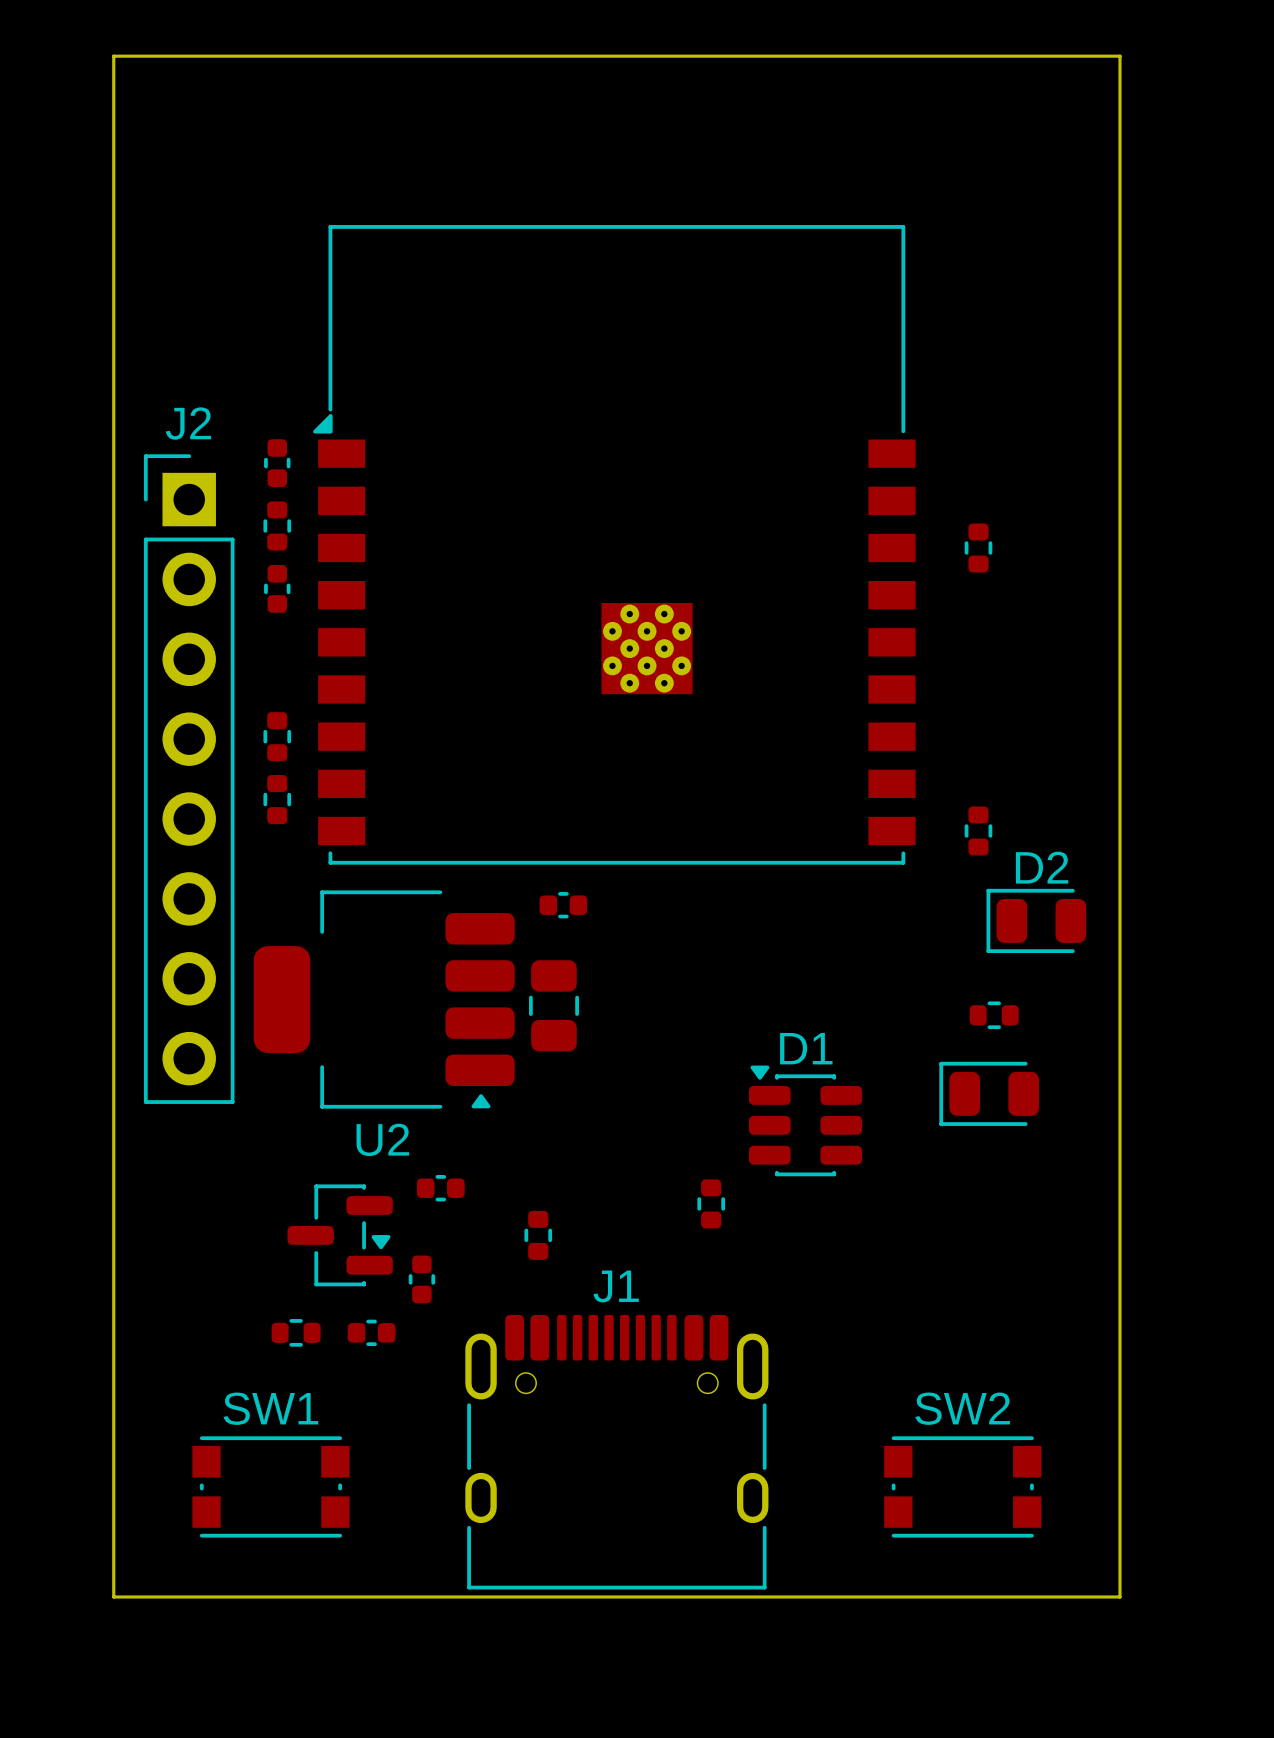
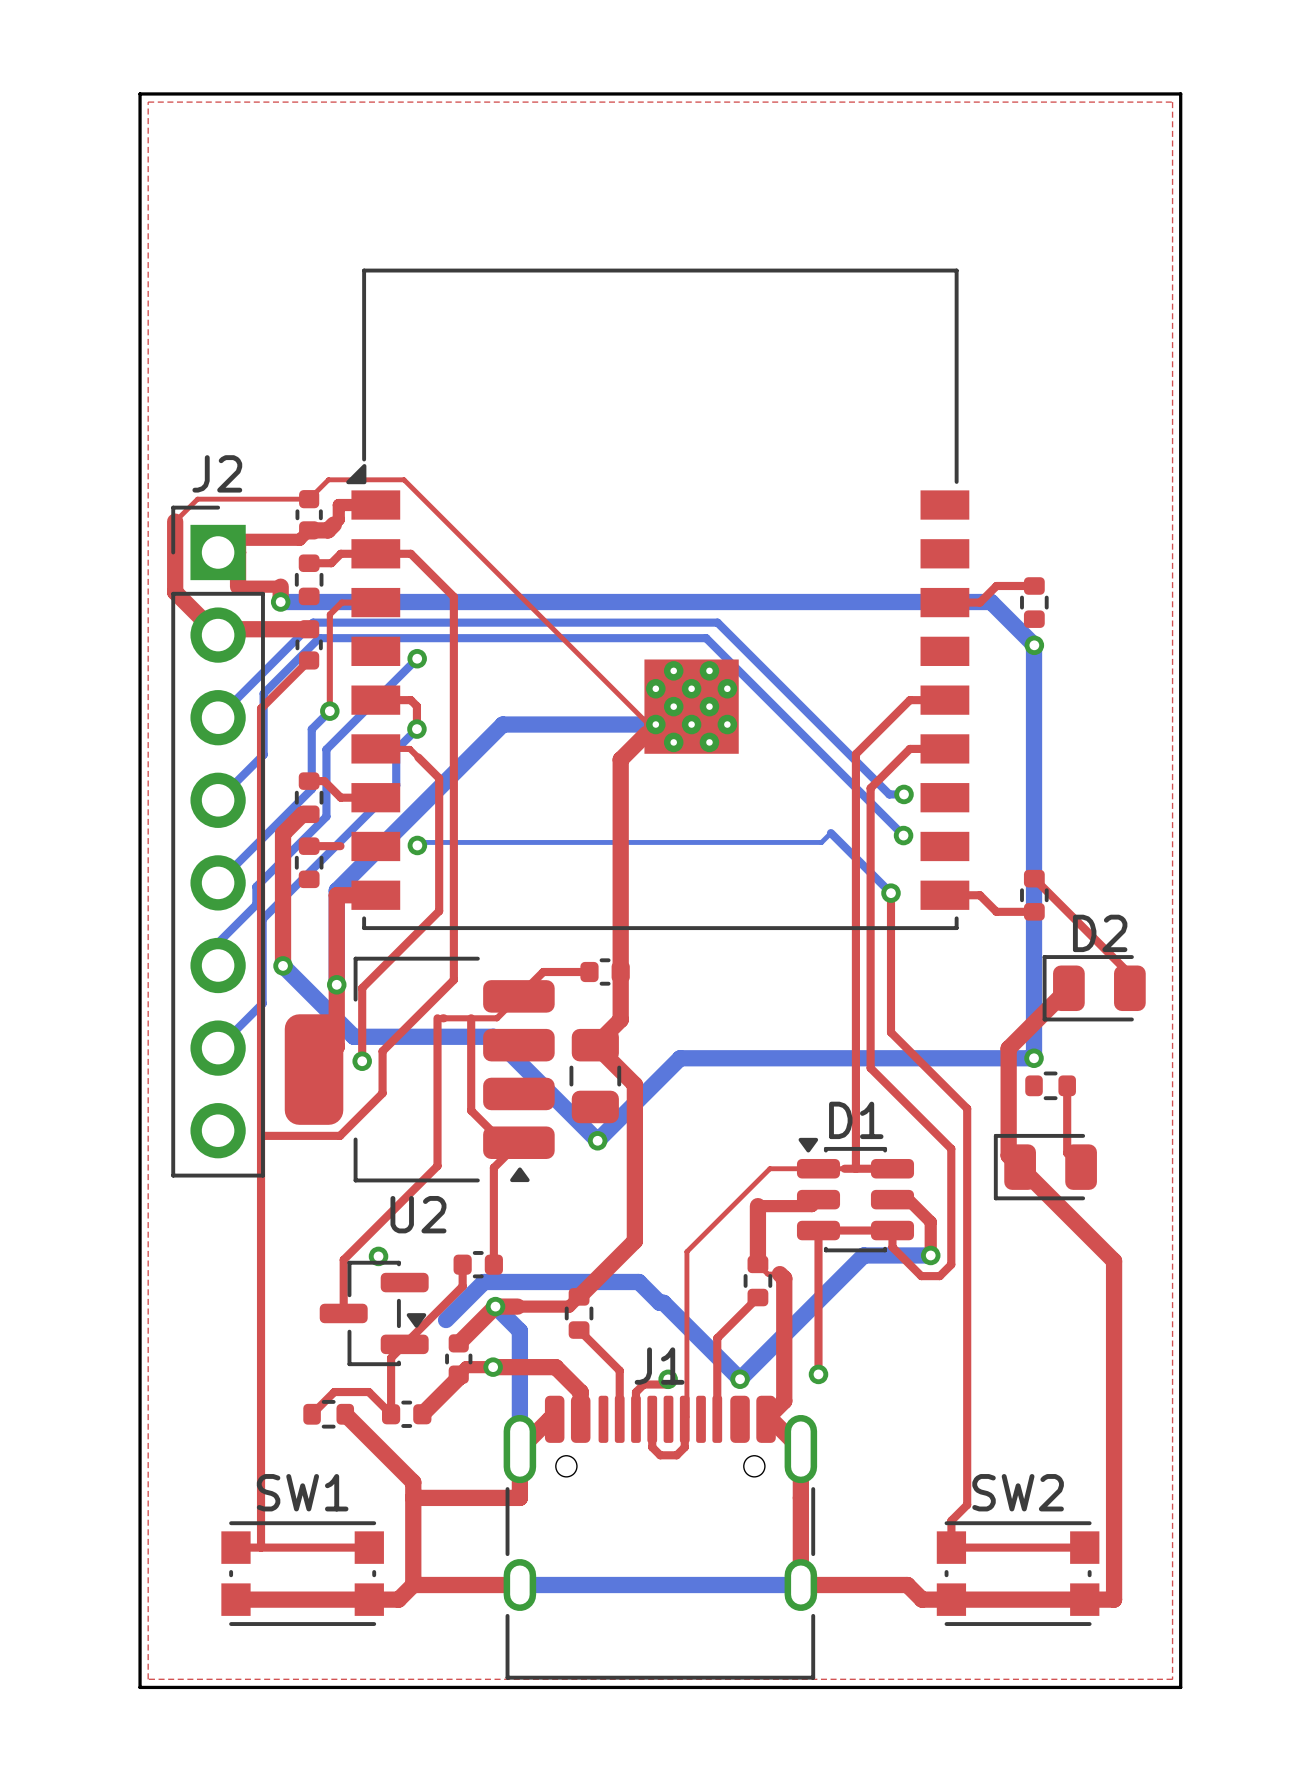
top zone outline: none -> (148, 102) (1172, 102) (1172, 1679) (148, 1679) (148, 102)
top track: none -> (375, 505) (338, 505) (338, 519) (328, 530) (309, 530) (299, 539) (238, 539) (238, 586) (280, 586) (280, 602)
top track: none -> (309, 563) (331, 563) (340, 553) (410, 553) (453, 596) (453, 979) (382, 1051) (382, 1093) (340, 1135) (261, 1135)
top track: none -> (1034, 585) (996, 585) (979, 602) (944, 602)
bottom track: none -> (280, 602) (991, 602) (1034, 645)
via: none -> (280, 602)
top track: none -> (375, 602) (341, 602) (329, 614) (329, 711)
top track: none -> (309, 629) (223, 629) (218, 635) (175, 592) (175, 521) (197, 499) (309, 499) (328, 479) (404, 479) (646, 722) (646, 733) (620, 759) (620, 1019) (595, 1045) (634, 1084) (634, 1241) (569, 1306) (495, 1306) (458, 1343)
bottom track: none -> (1034, 645) (1034, 1058) (680, 1058) (597, 1140) (493, 1036) (353, 1036) (283, 965)
via: none -> (1034, 645)
bottom track: none -> (417, 658) (326, 749) (326, 816) (256, 886) (256, 904) (218, 942) (218, 965)
via: none -> (417, 658)
top track: none -> (309, 660) (261, 708) (261, 1547)
top track: none -> (375, 700) (410, 700) (416, 706) (416, 729)
top track: none -> (944, 700) (909, 700) (855, 754) (855, 1168)
bottom track: none -> (329, 711) (311, 729) (311, 789) (218, 882)
via: none -> (329, 711)
bottom track: none -> (218, 717) (313, 622) (717, 622) (889, 794) (904, 794)
bottom track: none -> (655, 724) (502, 724) (336, 890) (336, 984)
bottom track: none -> (416, 729) (396, 749) (396, 785) (262, 919) (262, 1003) (218, 1048)
via: none -> (416, 729)
top track: none -> (375, 748) (409, 748) (439, 778) (439, 911) (362, 988) (362, 1061)
top track: none -> (944, 748) (909, 748) (870, 788) (870, 1068) (951, 1148) (951, 1264) (939, 1276) (921, 1276) (892, 1247) (892, 1230) (818, 1230) (818, 1374)
top track: none -> (309, 781) (324, 781) (340, 797) (375, 797)
via: none -> (904, 794)
bottom track: none -> (218, 800) (263, 754) (263, 693) (319, 638) (706, 638) (903, 835)
top track: none -> (309, 814) (302, 814) (283, 833) (283, 965)
via: none -> (903, 835)
bottom track: none -> (417, 845) (420, 842) (821, 842) (830, 833) (891, 893)
via: none -> (417, 845)
top track: none -> (309, 846) (340, 846)
top track: none -> (1034, 878) (1129, 974) (1129, 988)
top track: none -> (891, 893) (891, 1032) (967, 1108) (967, 1504) (951, 1520) (951, 1547) (1084, 1547)
via: none -> (891, 893)
top track: none -> (375, 895) (336, 895) (336, 1046) (314, 1069)
top track: none -> (944, 895) (979, 895) (996, 911) (1034, 911)
via: none -> (283, 965)
top track: none -> (589, 972) (543, 972) (496, 1018) (437, 1018) (437, 1166) (343, 1259) (343, 1313)
via: none -> (336, 984)
top track: none -> (1068, 988) (1008, 1048) (1008, 1155) (1114, 1261) (1114, 1599) (922, 1599) (907, 1585) (800, 1585) (800, 1449) (771, 1419) (766, 1419) (784, 1401) (784, 1278) (779, 1274) (767, 1274) (757, 1264) (757, 1206) (812, 1206) (818, 1199)
top track: none -> (471, 1018) (471, 1110) (511, 1150)
via: none -> (1034, 1058)
via: none -> (362, 1061)
top track: none -> (1067, 1085) (1067, 1153) (1081, 1167)
via: none -> (597, 1140)
top track: none -> (518, 1142) (493, 1167) (493, 1264)
top track: none -> (892, 1168) (769, 1168) (686, 1251) (686, 1417) (684, 1419) (684, 1447) (676, 1455) (660, 1455) (652, 1447) (652, 1419)
top track: none -> (892, 1199) (908, 1199) (930, 1222) (930, 1255)
bottom track: none -> (930, 1255) (863, 1255) (740, 1379) (663, 1302) (659, 1302) (638, 1281) (484, 1281) (446, 1320)
via: none -> (930, 1255)
via: none -> (378, 1256)
top track: none -> (462, 1264) (462, 1286) (391, 1357) (391, 1414) (368, 1392) (334, 1392) (312, 1414)
top track: none -> (757, 1297) (717, 1338) (717, 1419)
bottom track: none -> (495, 1306) (519, 1330) (519, 1449)
via: none -> (495, 1306)
top track: none -> (579, 1330) (619, 1370) (619, 1419)
via: none -> (493, 1367)
via: none -> (818, 1374)
via: none -> (740, 1379)
top track: none -> (668, 1379) (668, 1384) (643, 1384) (635, 1392) (635, 1419)
via: none -> (668, 1379)
top track: none -> (345, 1414) (413, 1482) (413, 1585)
top track: none -> (422, 1414) (458, 1377) (458, 1374) (466, 1367) (555, 1367) (580, 1392) (580, 1419)
top track: none -> (554, 1419) (549, 1419) (519, 1449) (519, 1497) (413, 1497)
top track: none -> (235, 1547) (369, 1547)
top track: none -> (413, 1585) (519, 1585)
top track: none -> (413, 1585) (398, 1599) (235, 1599)
bottom track: none -> (519, 1585) (800, 1585)

